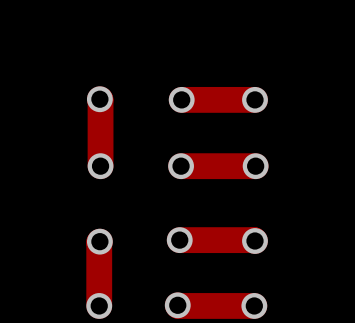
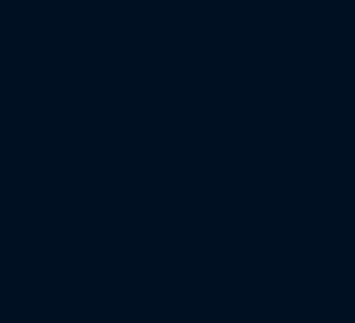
track: (99, 99) (100, 166) -> none
via: (99, 99) -> none
track: (181, 99) (254, 99) -> none
via: (181, 99) -> none
via: (254, 99) -> none
via: (100, 166) -> none
track: (181, 166) (255, 166) -> none
via: (181, 166) -> none
via: (255, 166) -> none
track: (179, 240) (254, 240) -> none
via: (179, 240) -> none
via: (254, 240) -> none
track: (99, 241) (99, 305) -> none
via: (99, 241) -> none
via: (99, 305) -> none
track: (177, 305) (254, 305) -> none
via: (177, 305) -> none
via: (254, 305) -> none

